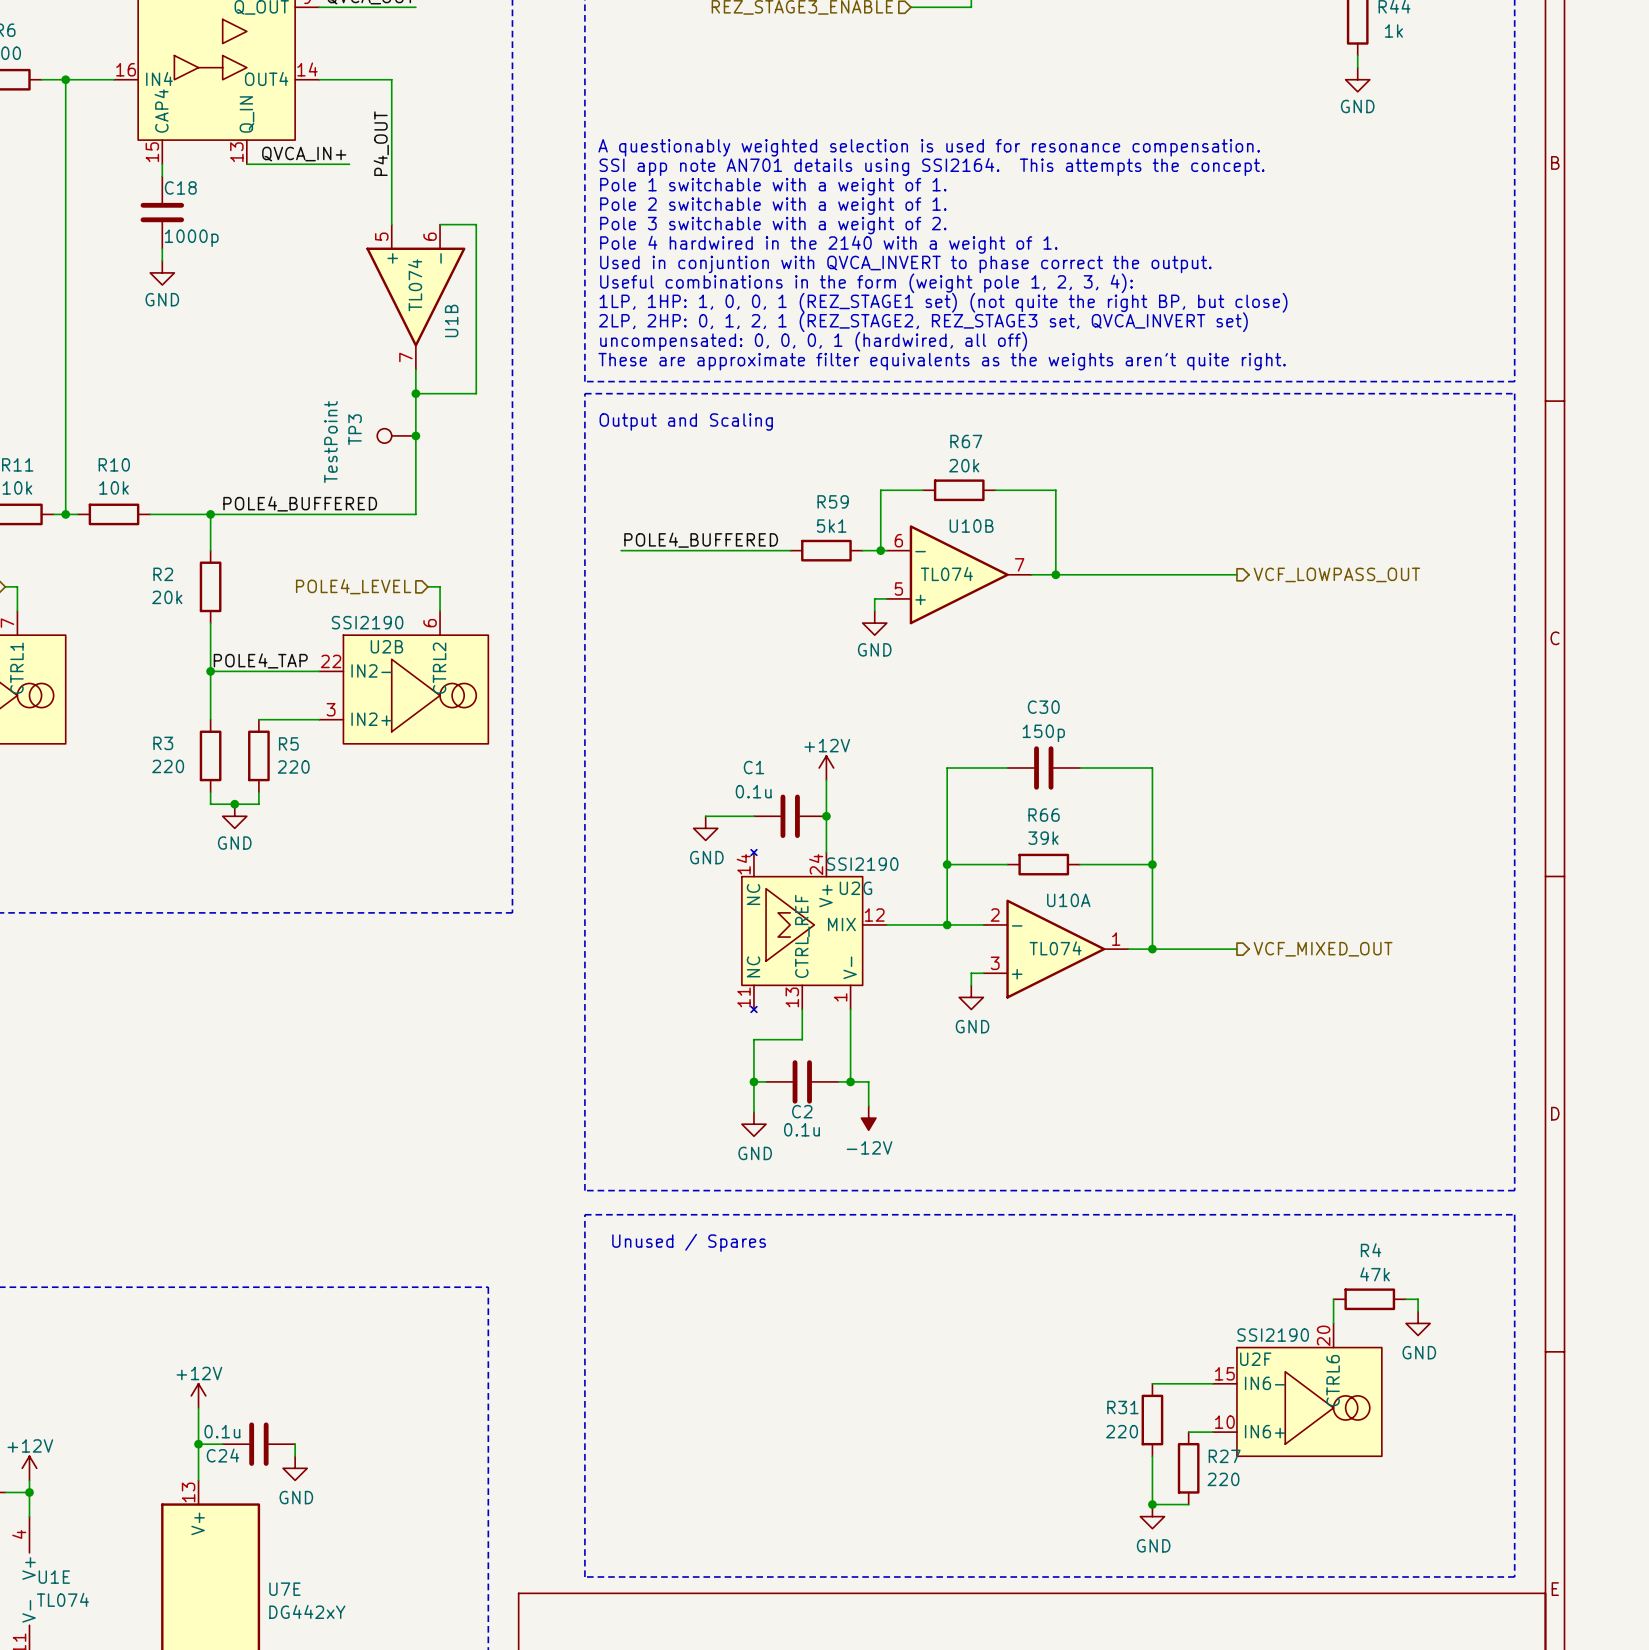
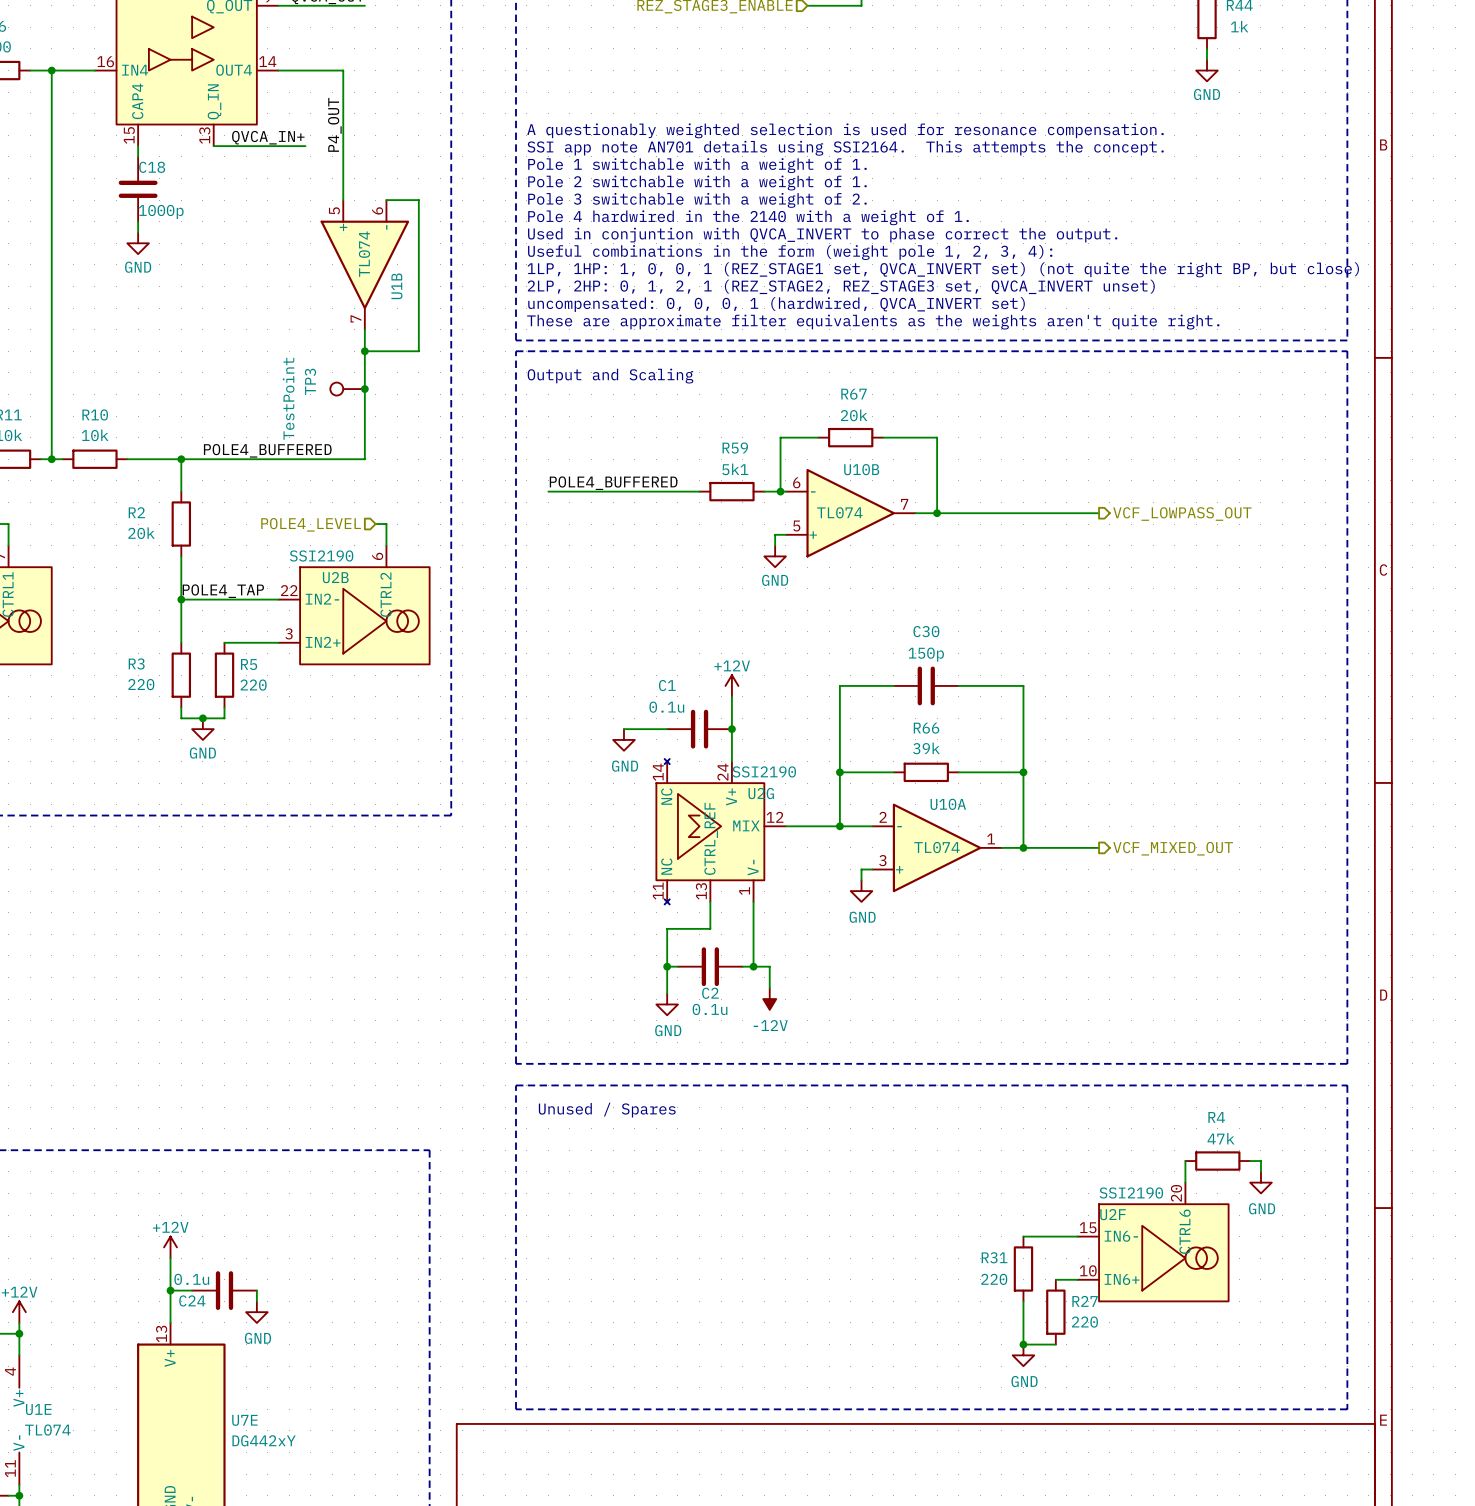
text: 1LP, 1HP: 1, 0, 0, 1 (REZ_STAGE1 set) (not quite the right BP, but close) (943, 302) -> 1LP, 1HP: 1, 0, 0, 1 (REZ_STAGE1 set, QVCA_INVERT set) (not quite the right BP, but close) (943, 269)
text: 2LP, 2HP: 0, 1, 2, 1 (REZ_STAGE2, REZ_STAGE3 set, QVCA_INVERT set) (923, 322) -> 2LP, 2HP: 0, 1, 2, 1 (REZ_STAGE2, REZ_STAGE3 set, QVCA_INVERT unset) (841, 286)
text: uncompensated: 0, 0, 0, 1 (hardwired, all off) (813, 341) -> uncompensated: 0, 0, 0, 1 (hardwired, QVCA_INVERT set) (776, 304)

